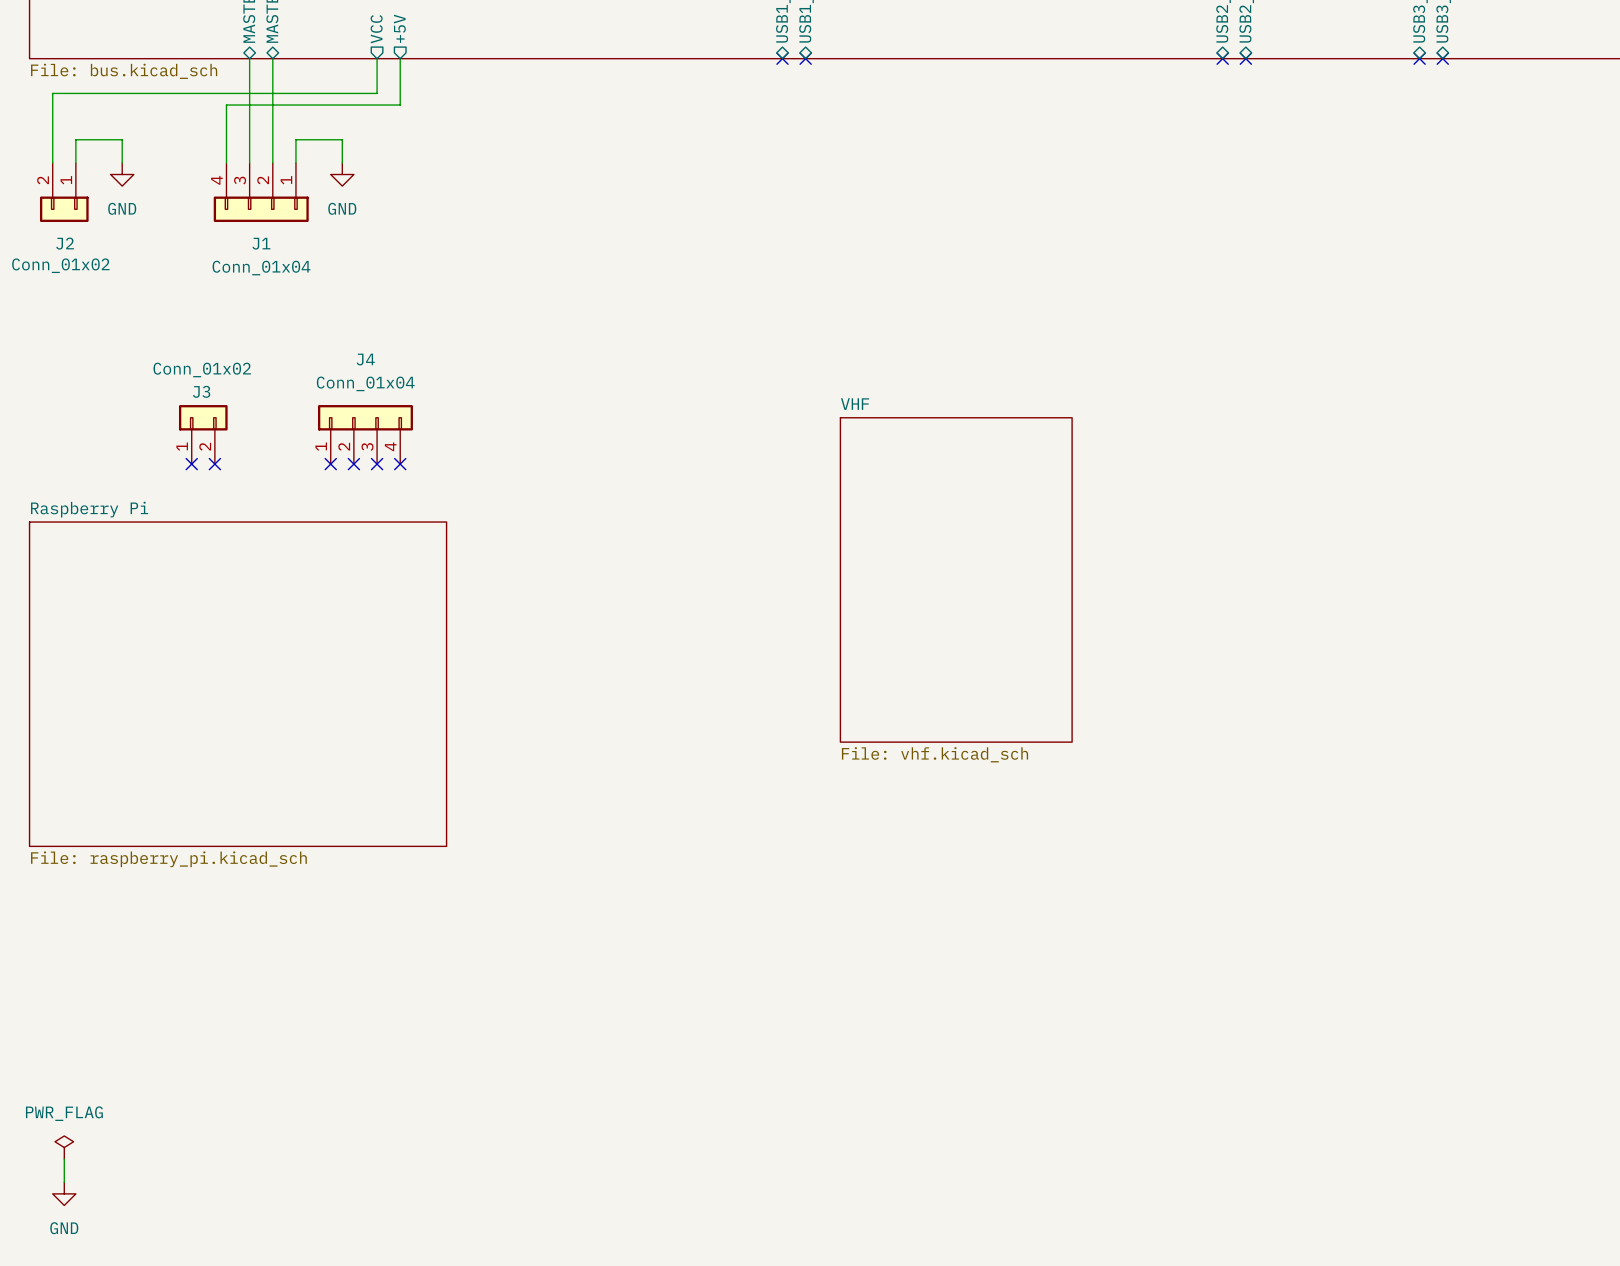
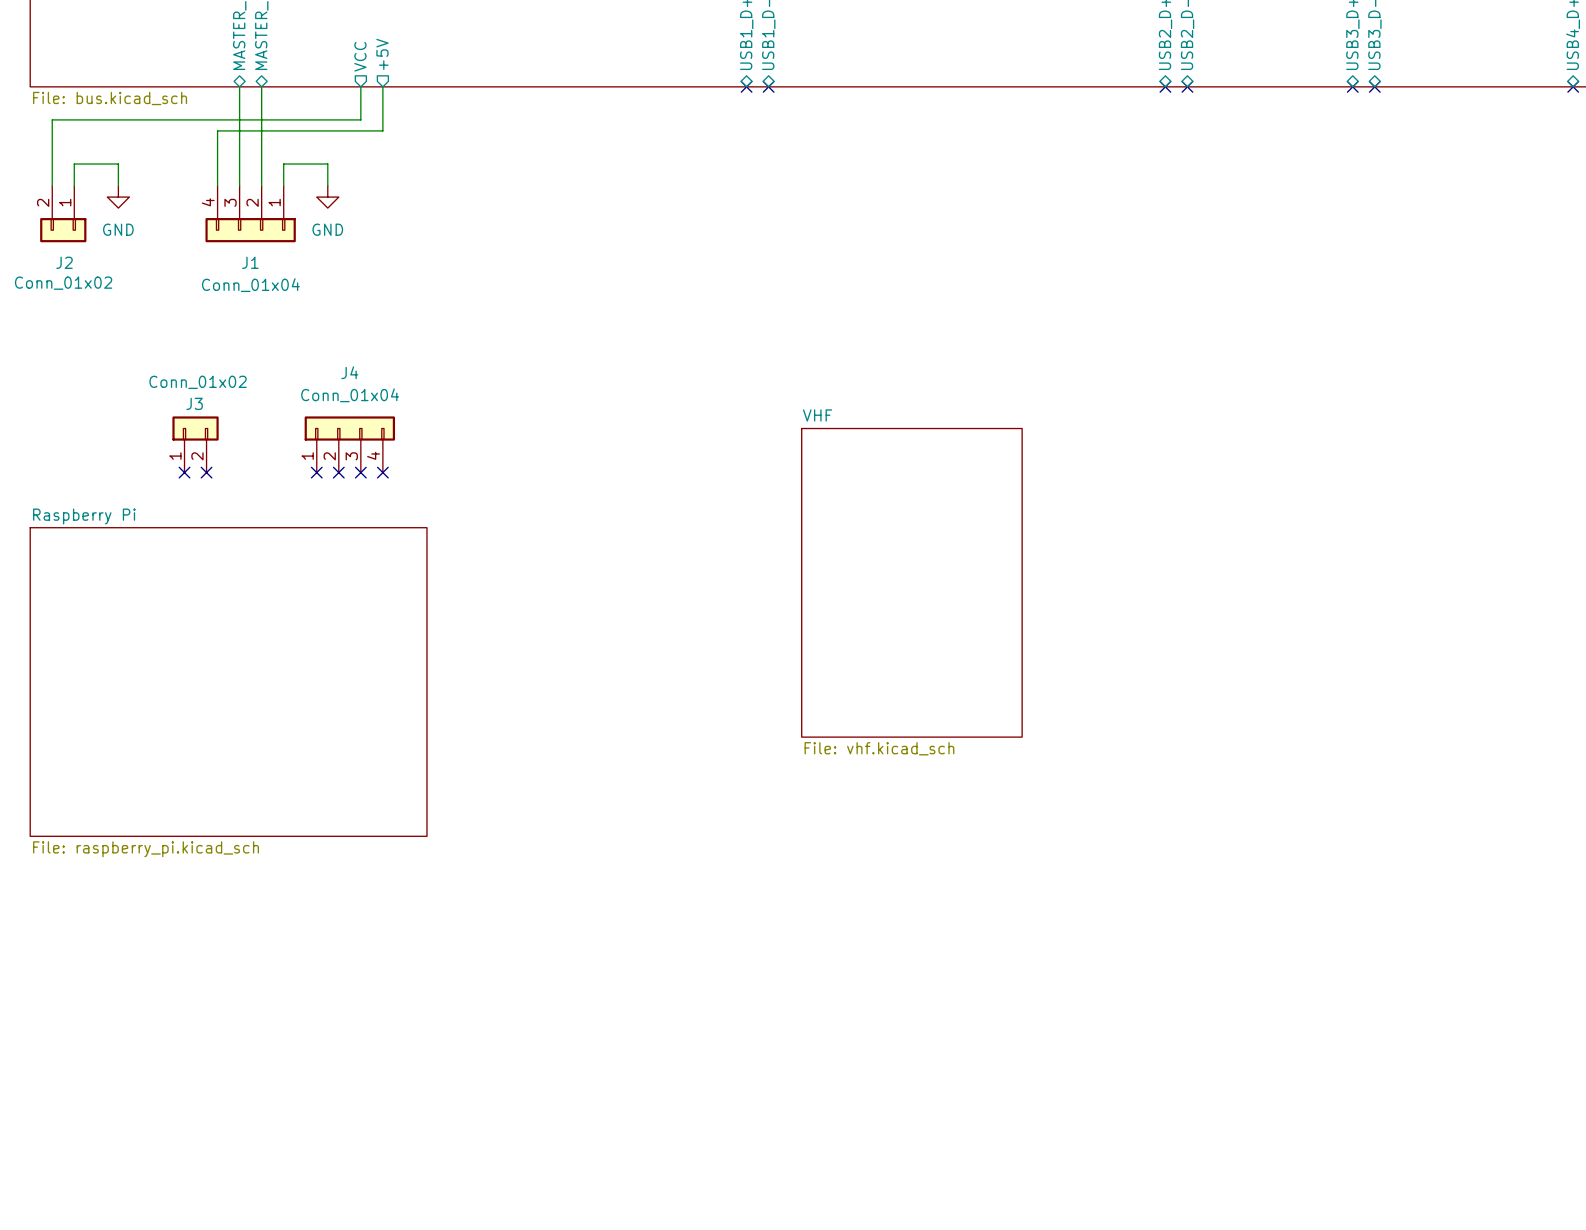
power symbol: PWR_FLAG (64, 1147) -> none
wire: (64, 1159) (64, 1182) -> none
power symbol: GND (64, 1193) -> none

